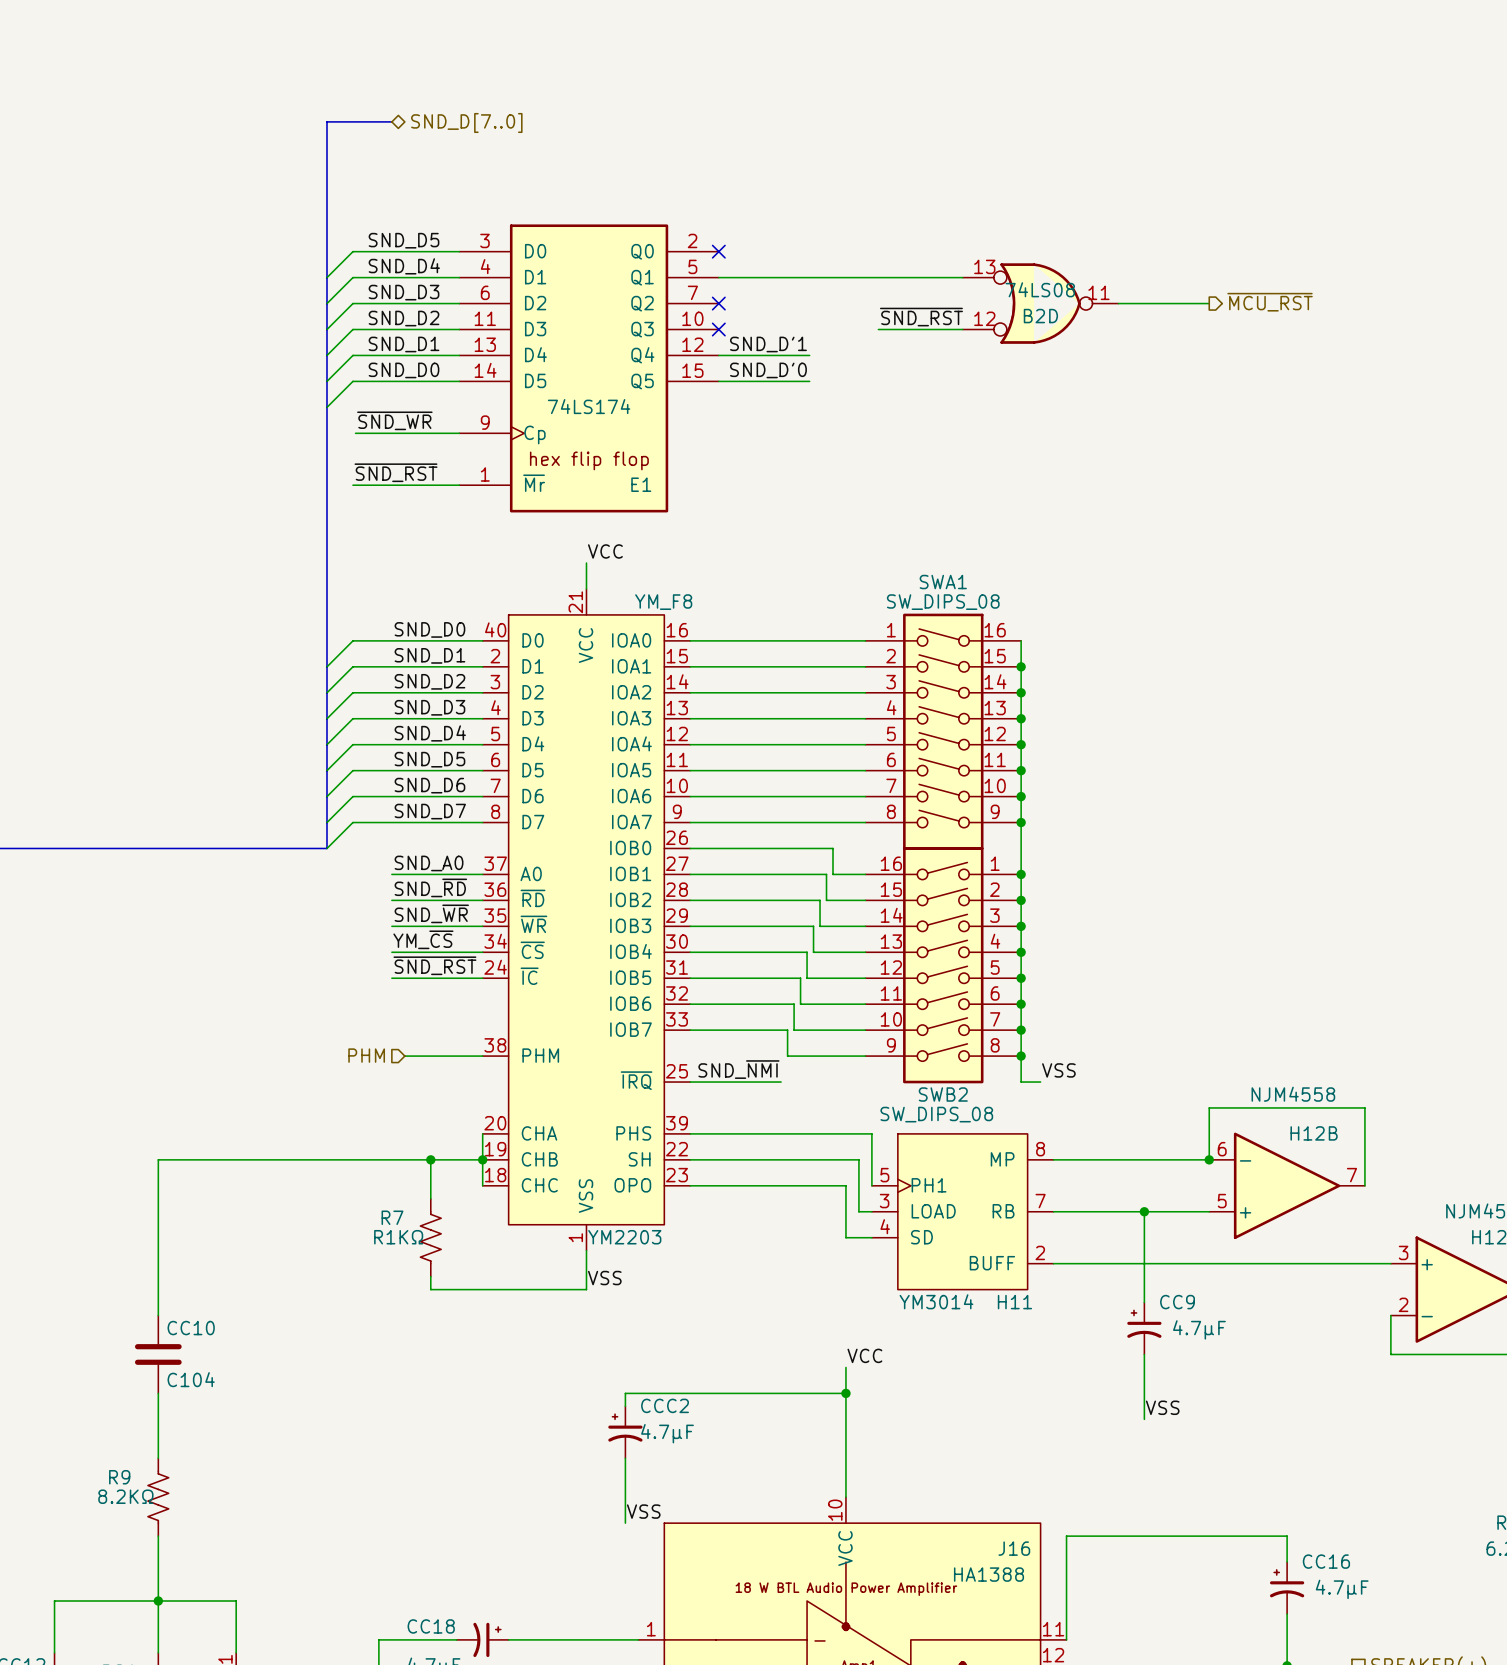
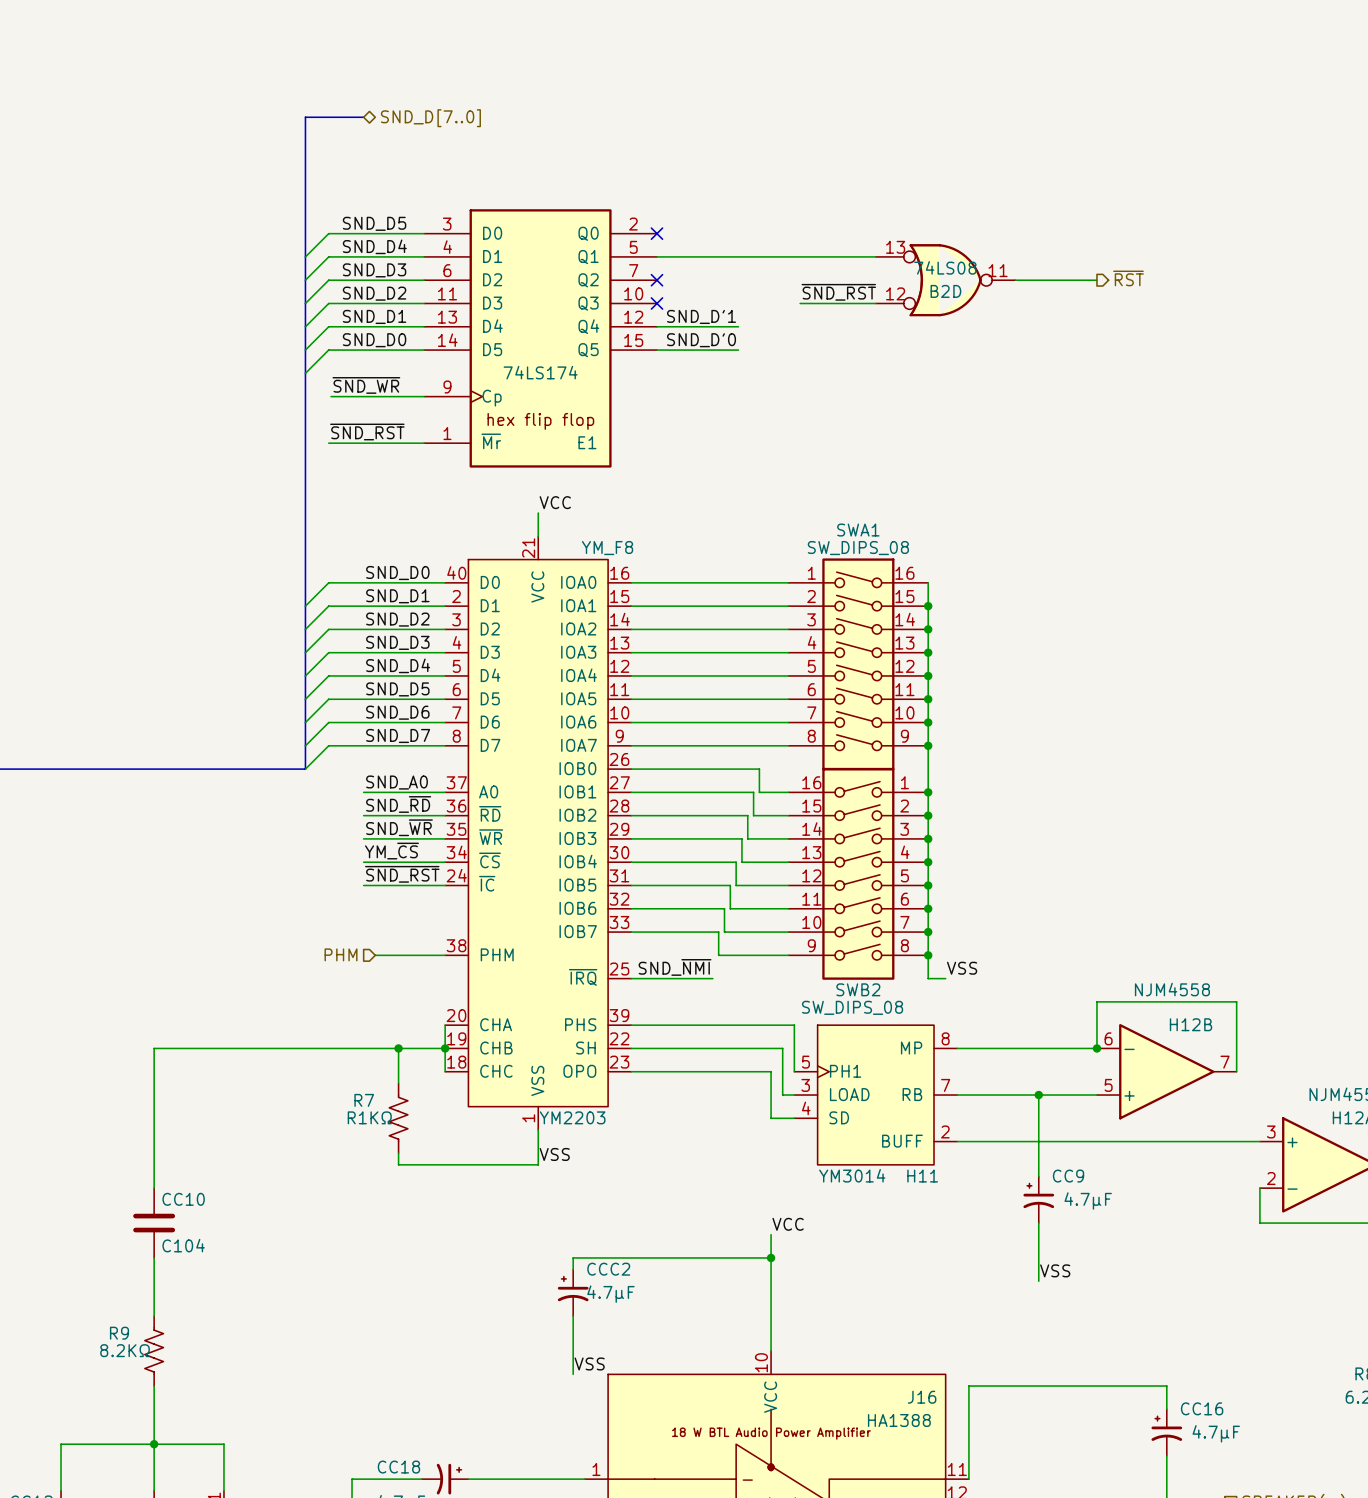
hierarchical label: ~{MCU_RST} (1270, 302) -> ~{RST} (1128, 278)

